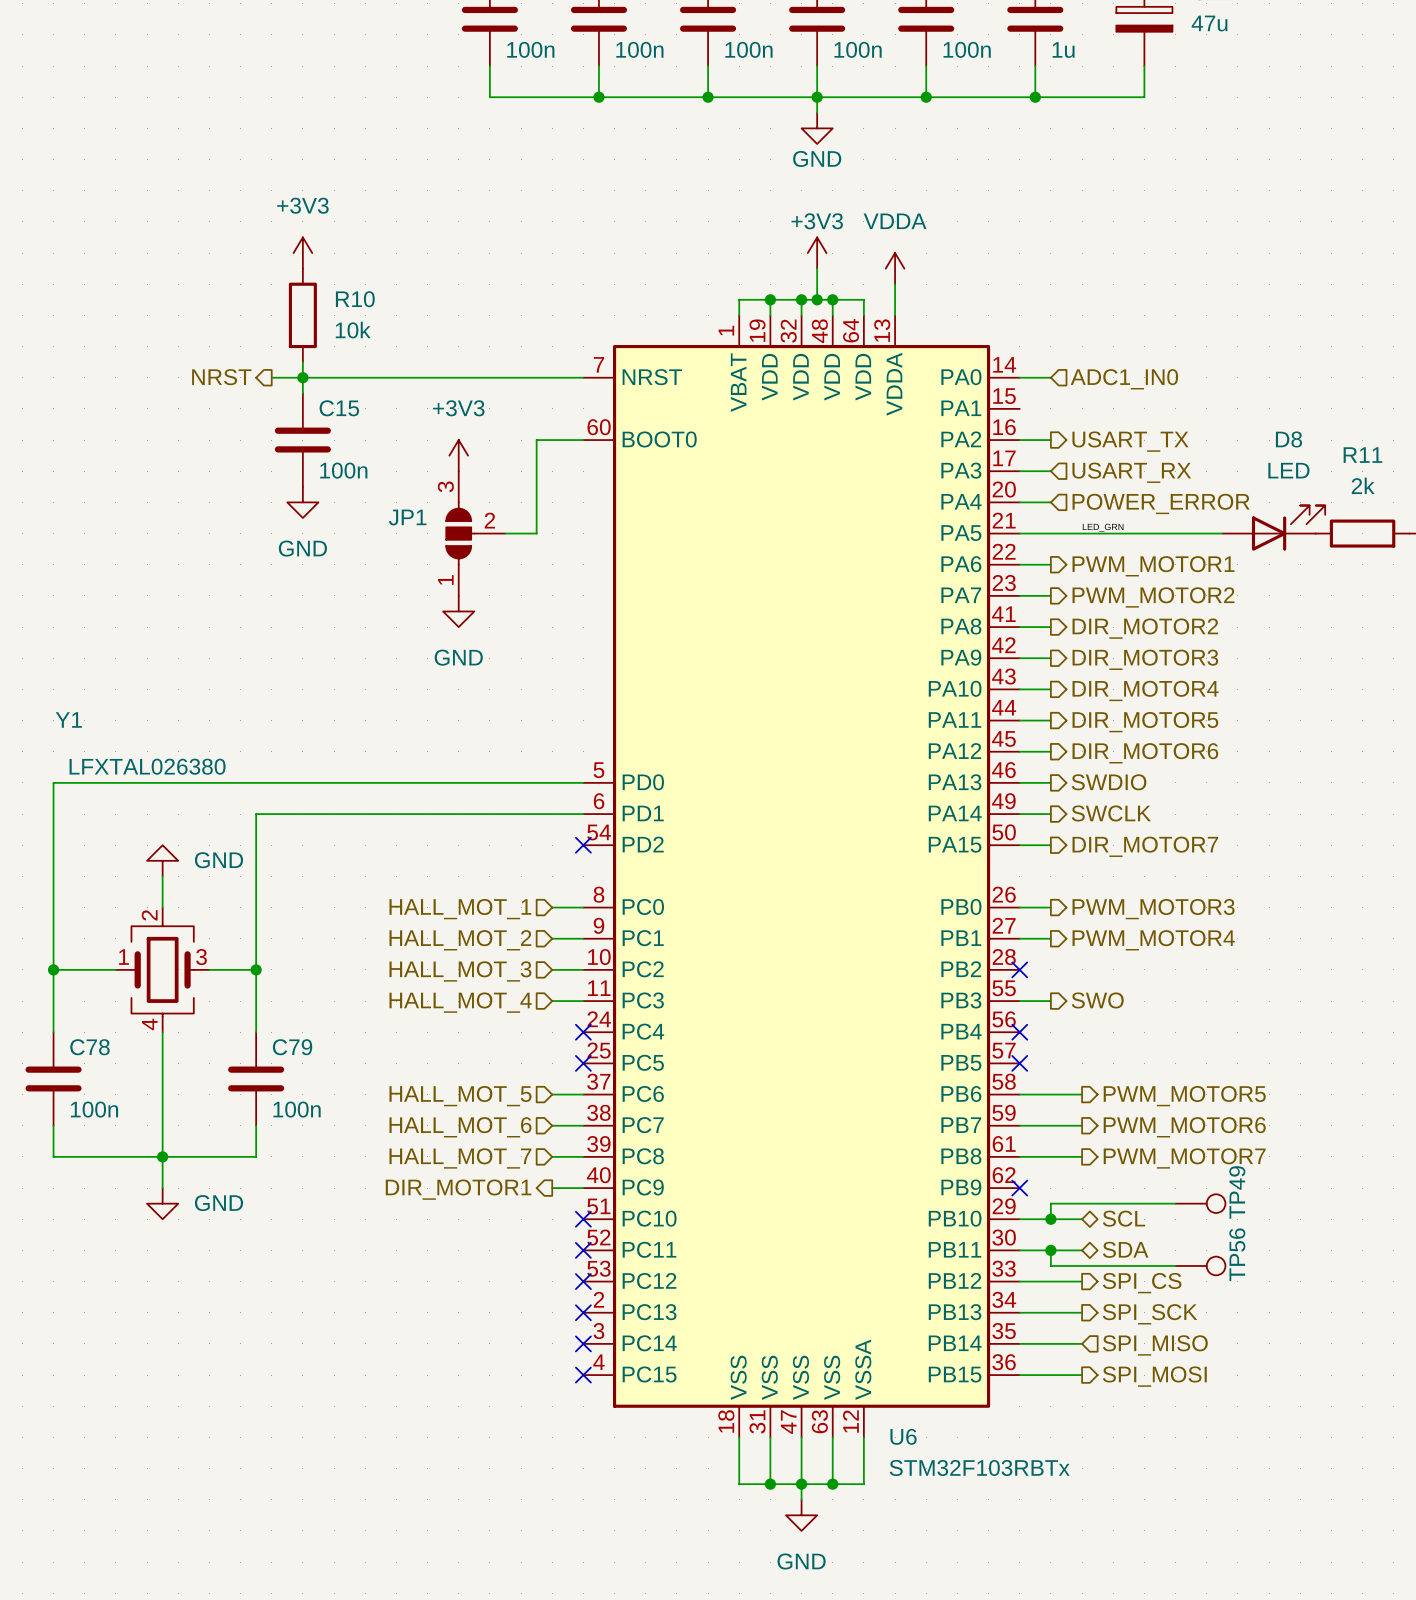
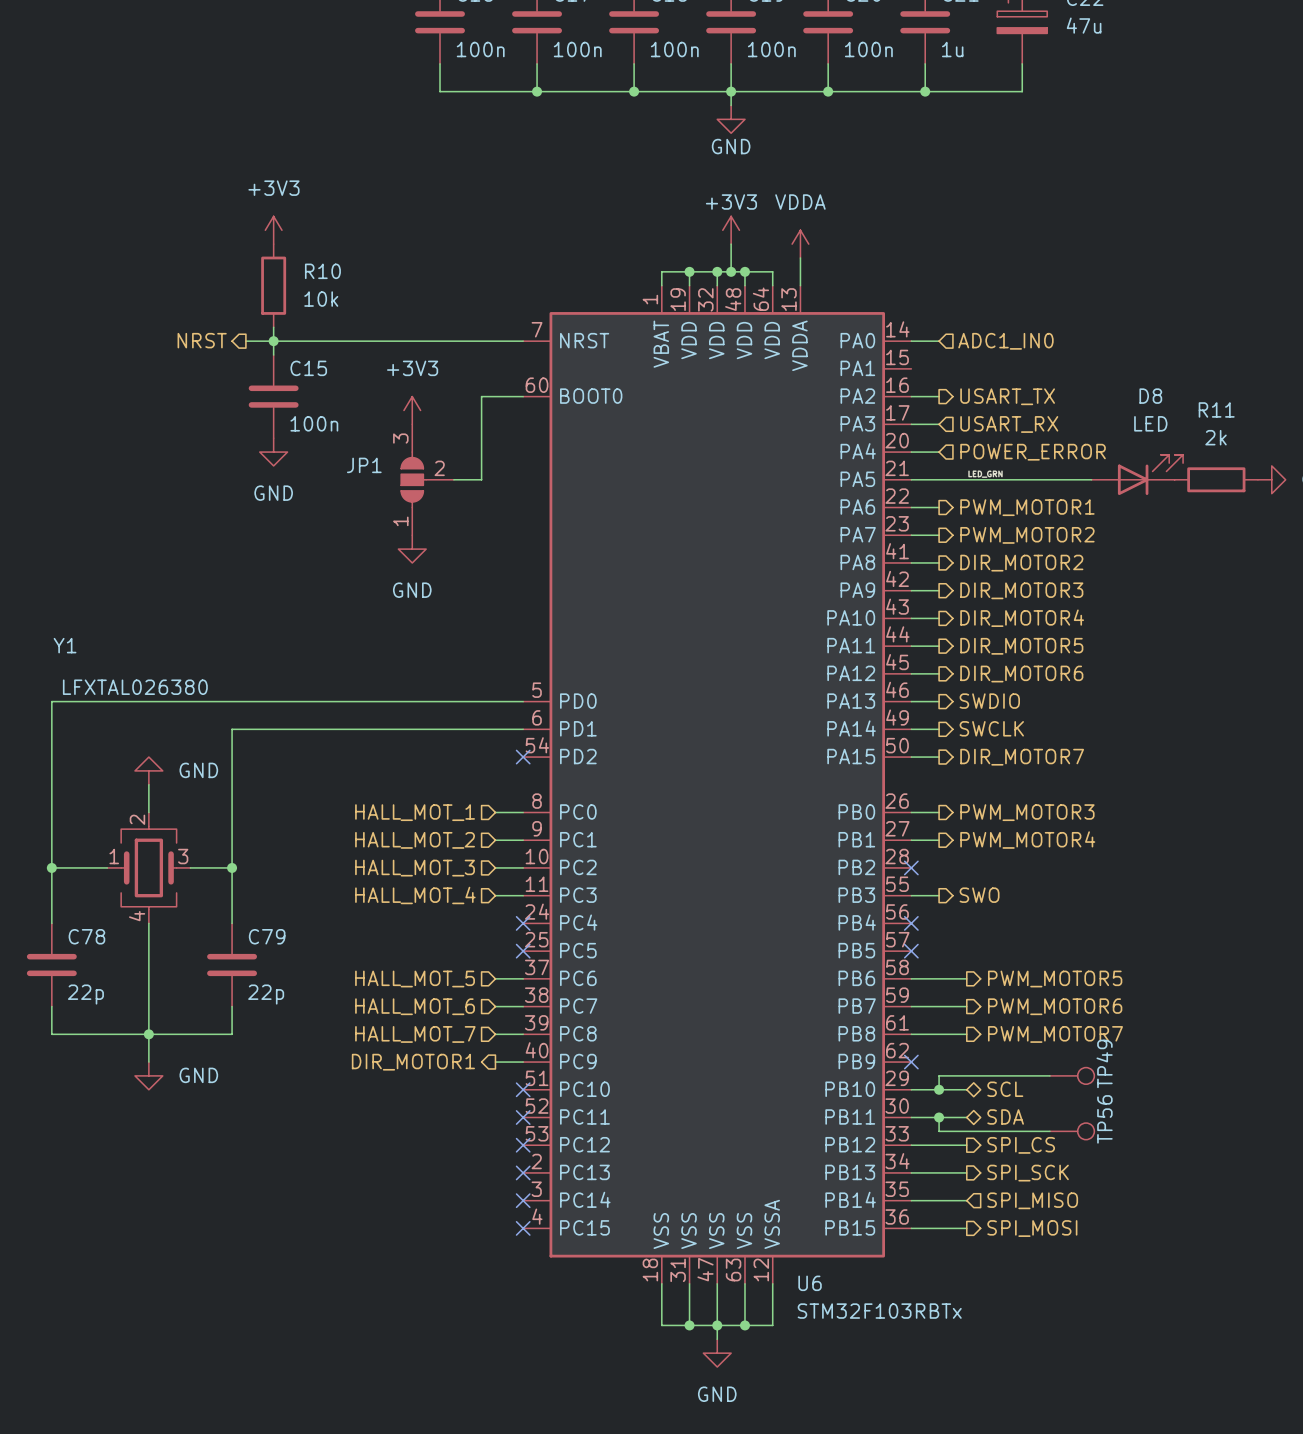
C78 value: 100n (94, 1109) -> 22p (85, 994)
C79 value: 100n (297, 1109) -> 22p (266, 994)

